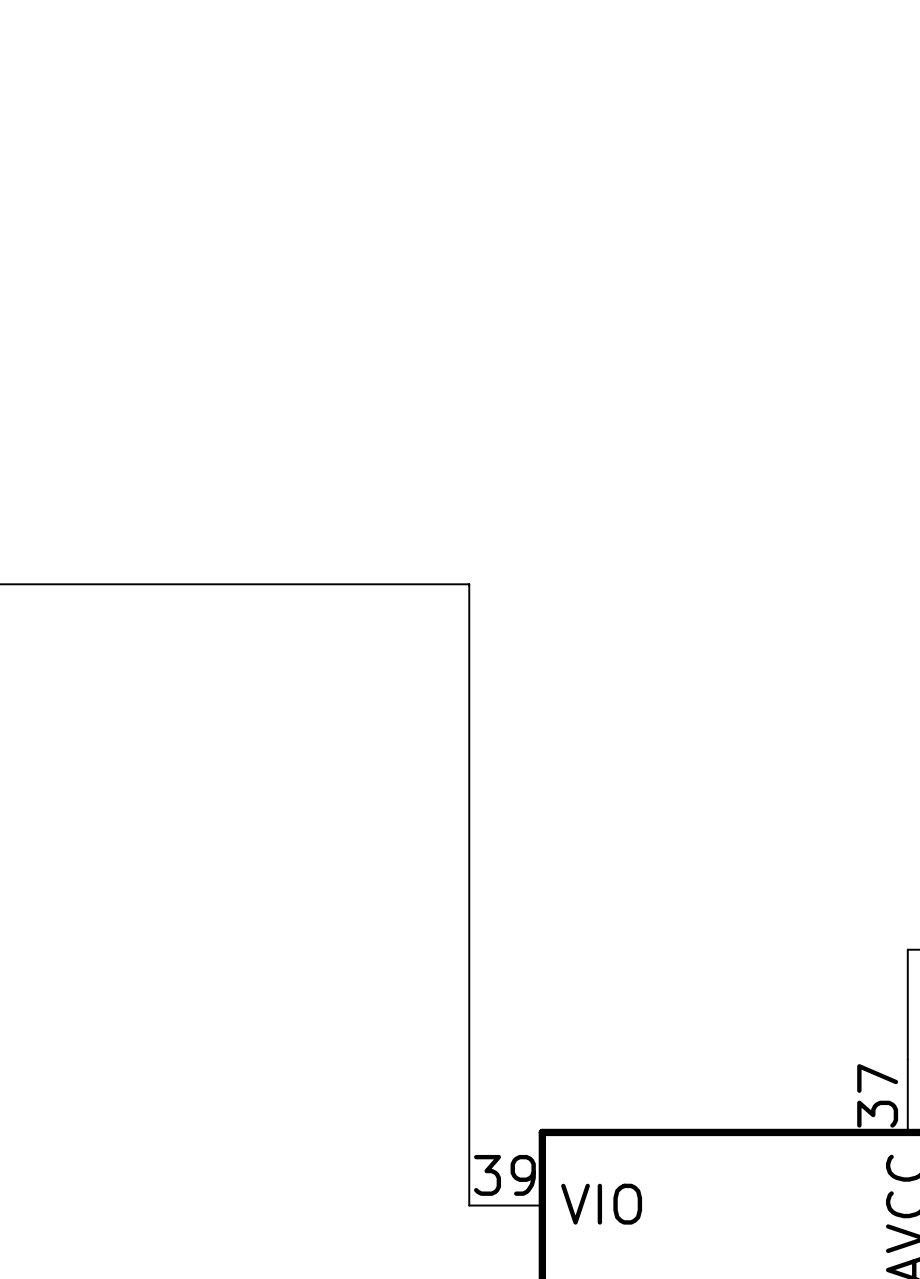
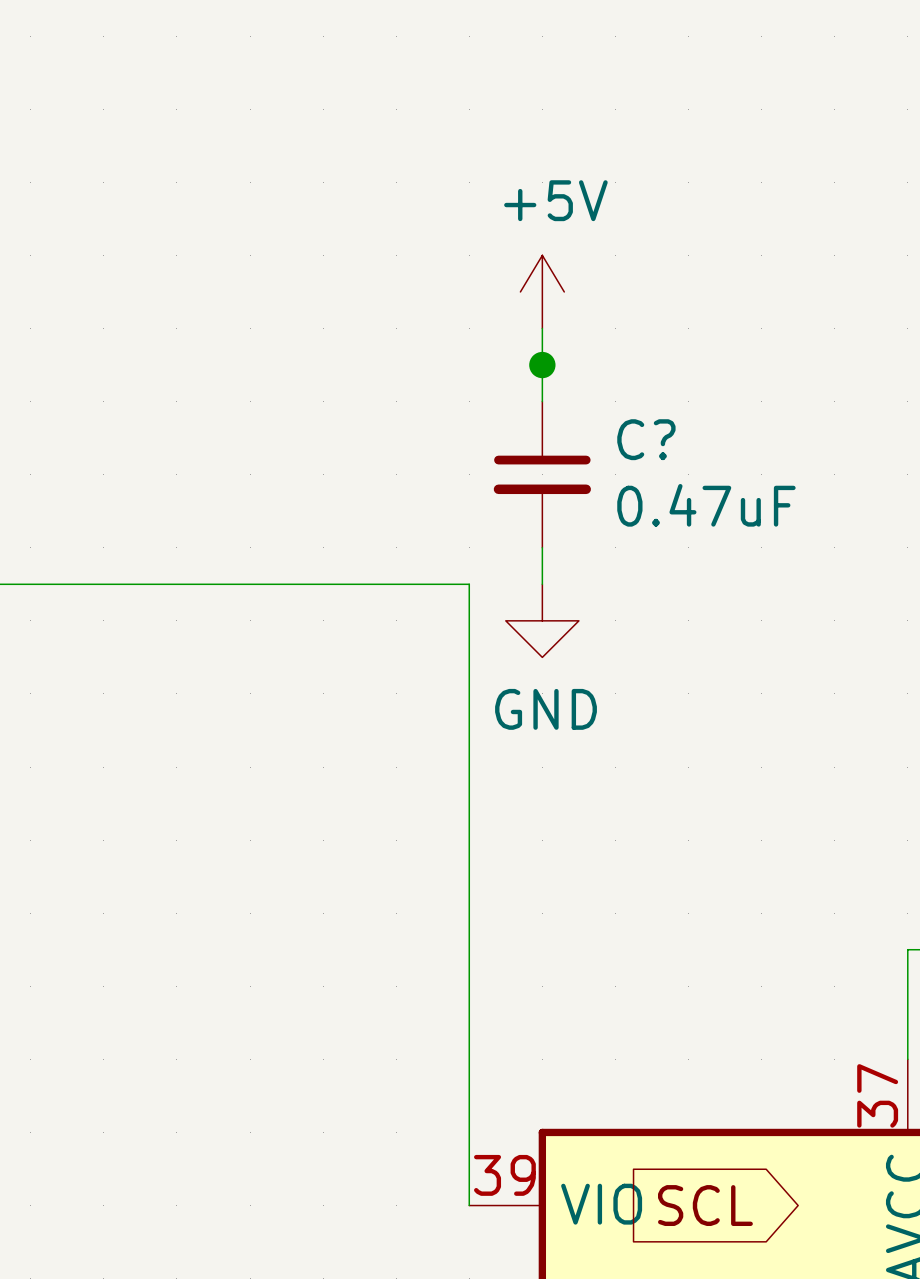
power symbol: none -> +5V (542, 291)
wire: none -> (542, 328) (542, 401)
junction: none -> (542, 365)
C?: none -> 0.47uF (542, 474)
wire: none -> (542, 547) (542, 584)
power symbol: none -> GND (542, 620)
global label: none -> SCL (705, 1205)

